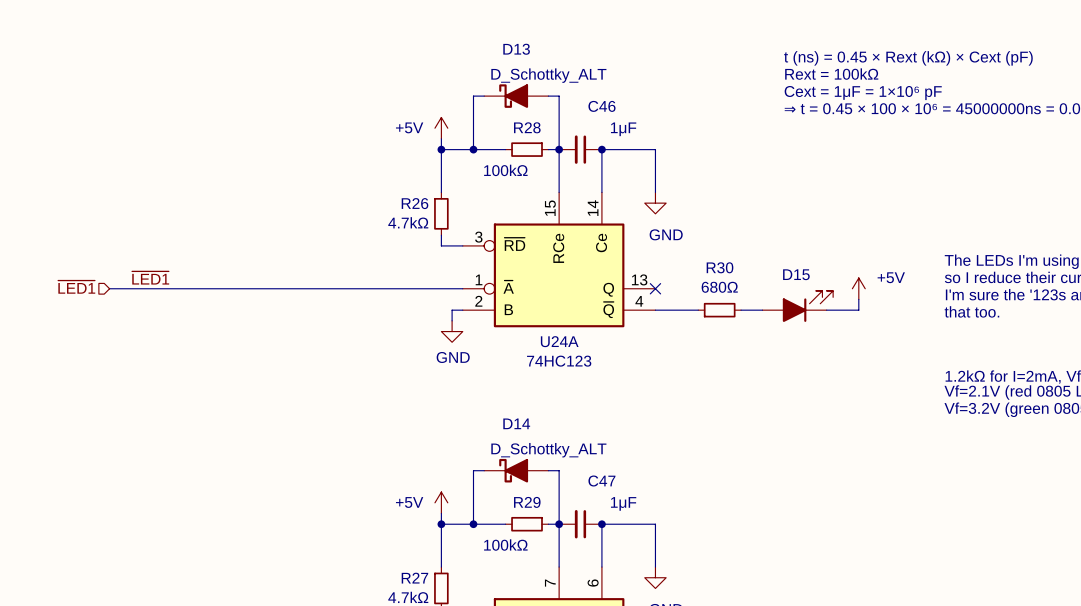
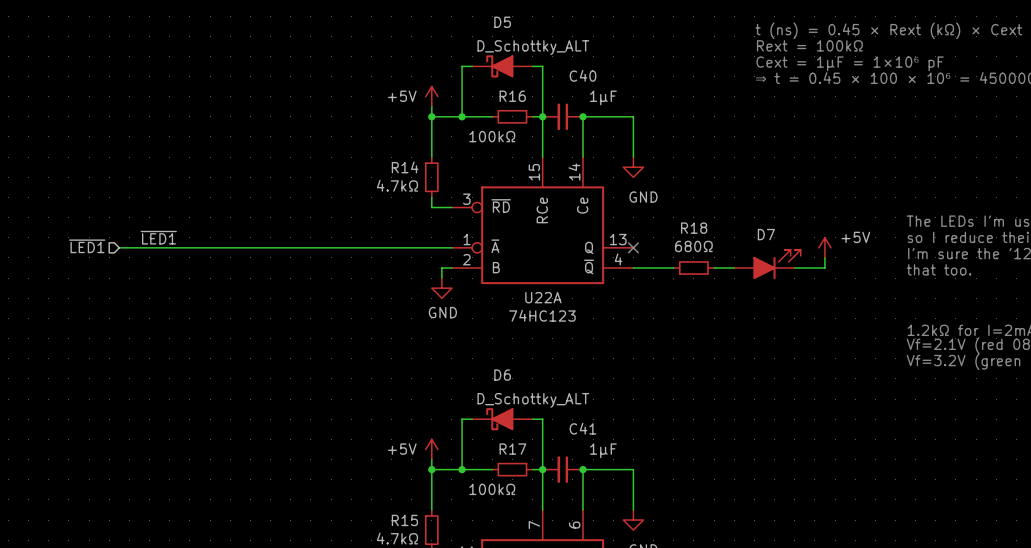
D13 name: D13 (516, 49) -> D5 (502, 22)
C46 name: C46 (601, 106) -> C40 (583, 75)
R28 name: R28 (527, 127) -> R16 (512, 96)
R26 name: R26 (415, 203) -> R14 (405, 167)
R30 name: R30 (720, 267) -> R18 (694, 228)
D15 name: D15 (796, 274) -> D7 (766, 234)
U24A name: U24A (559, 341) -> U22A (543, 297)
D14 name: D14 (516, 423) -> D6 (502, 375)
C47 name: C47 (601, 481) -> C41 (583, 428)
R29 name: R29 (527, 502) -> R17 (512, 449)
R27 name: R27 (414, 578) -> R15 (404, 520)

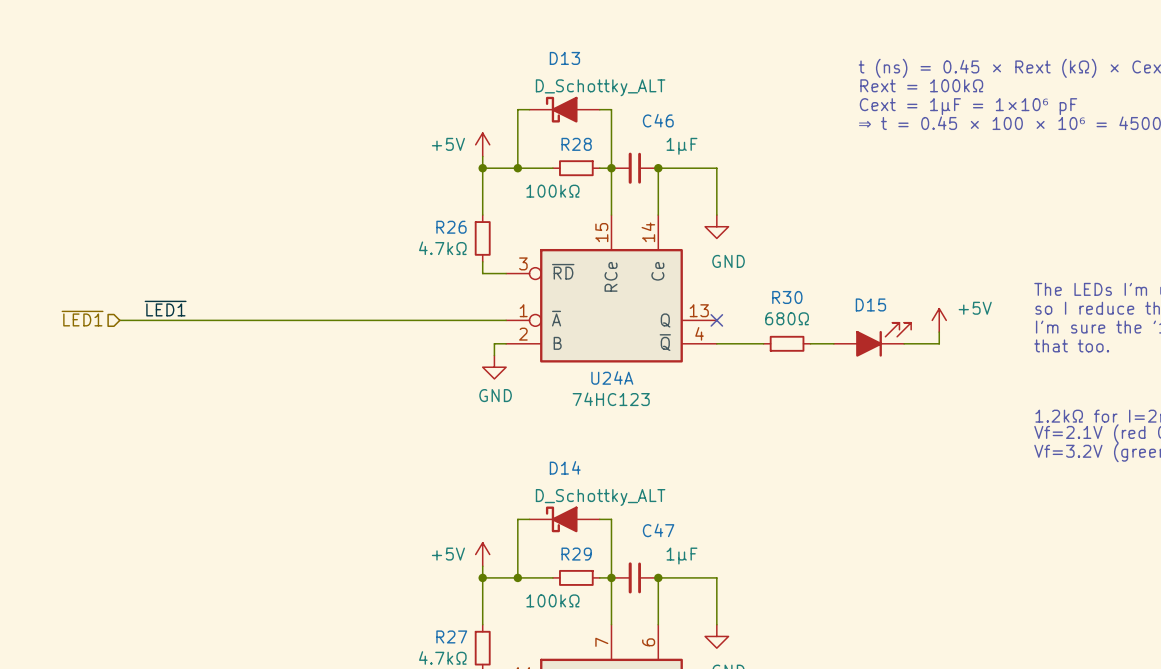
D5 name: D5 (502, 22) -> D13 (564, 58)
C40 name: C40 (583, 75) -> C46 (658, 120)
R16 name: R16 (512, 96) -> R28 (576, 144)
R14 name: R14 (405, 167) -> R26 (451, 227)
R18 name: R18 (694, 228) -> R30 (787, 297)
D7 name: D7 (766, 234) -> D15 (870, 304)
U22A name: U22A (543, 297) -> U24A (612, 377)
D6 name: D6 (502, 375) -> D14 (565, 467)
C41 name: C41 (583, 428) -> C47 (658, 530)
R17 name: R17 (512, 449) -> R29 (576, 554)
R15 name: R15 (404, 520) -> R27 (451, 636)

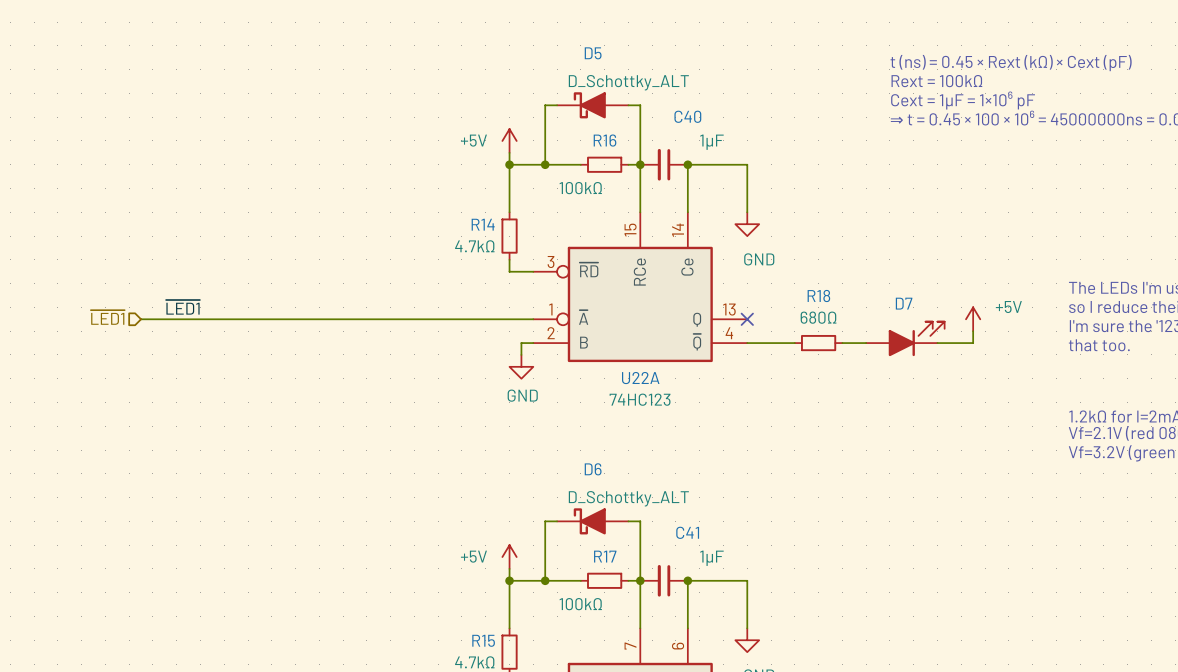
D13 name: D13 (564, 58) -> D5 (593, 53)
C46 name: C46 (658, 120) -> C40 (687, 116)
R28 name: R28 (576, 144) -> R16 (605, 140)
R26 name: R26 (451, 227) -> R14 (483, 224)
R30 name: R30 (787, 297) -> R18 (818, 296)
D15 name: D15 (870, 304) -> D7 (904, 303)
U24A name: U24A (612, 377) -> U22A (640, 378)
D14 name: D14 (565, 467) -> D6 (593, 469)
C47 name: C47 (658, 530) -> C41 (687, 532)
R29 name: R29 (576, 554) -> R17 (605, 556)
R27 name: R27 (451, 636) -> R15 (483, 640)

